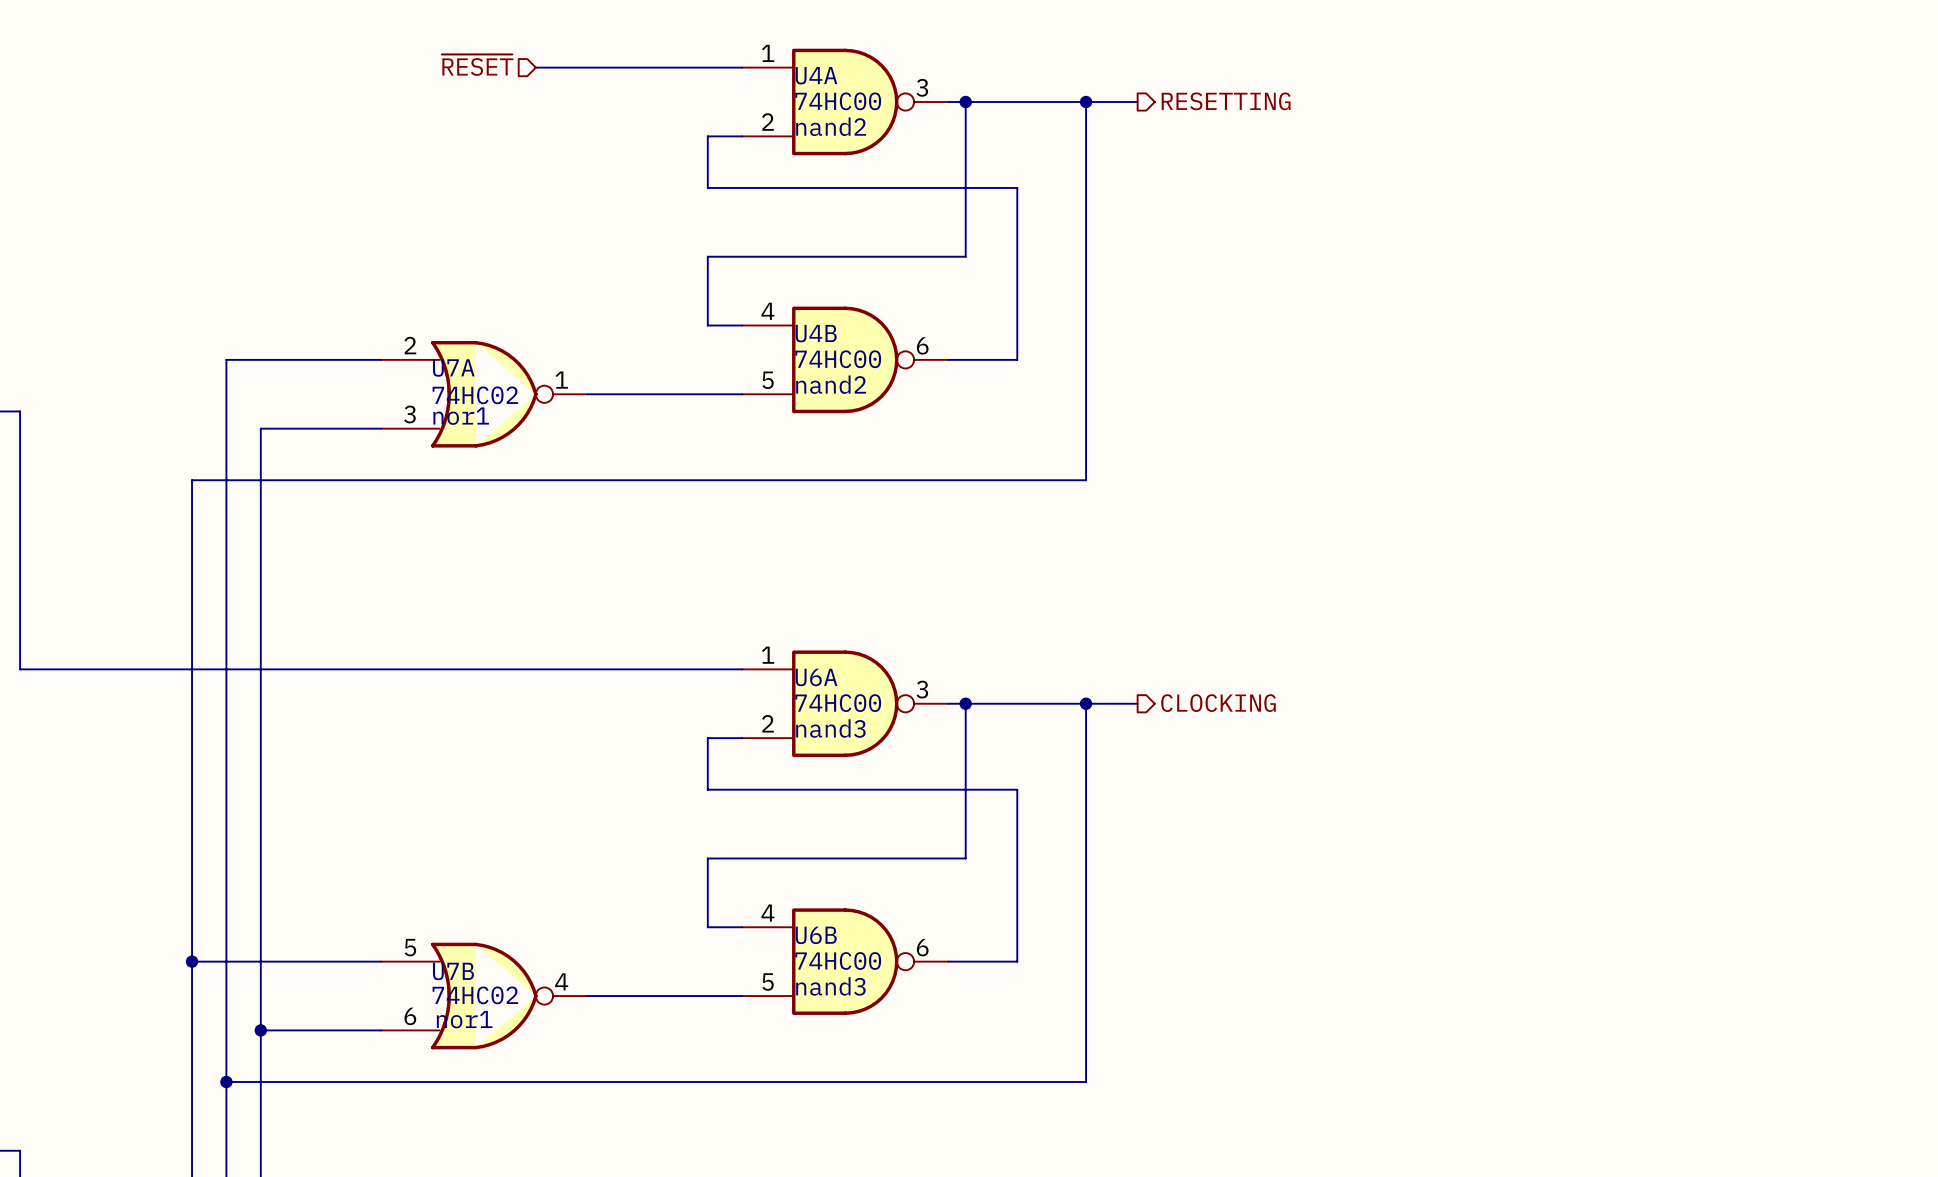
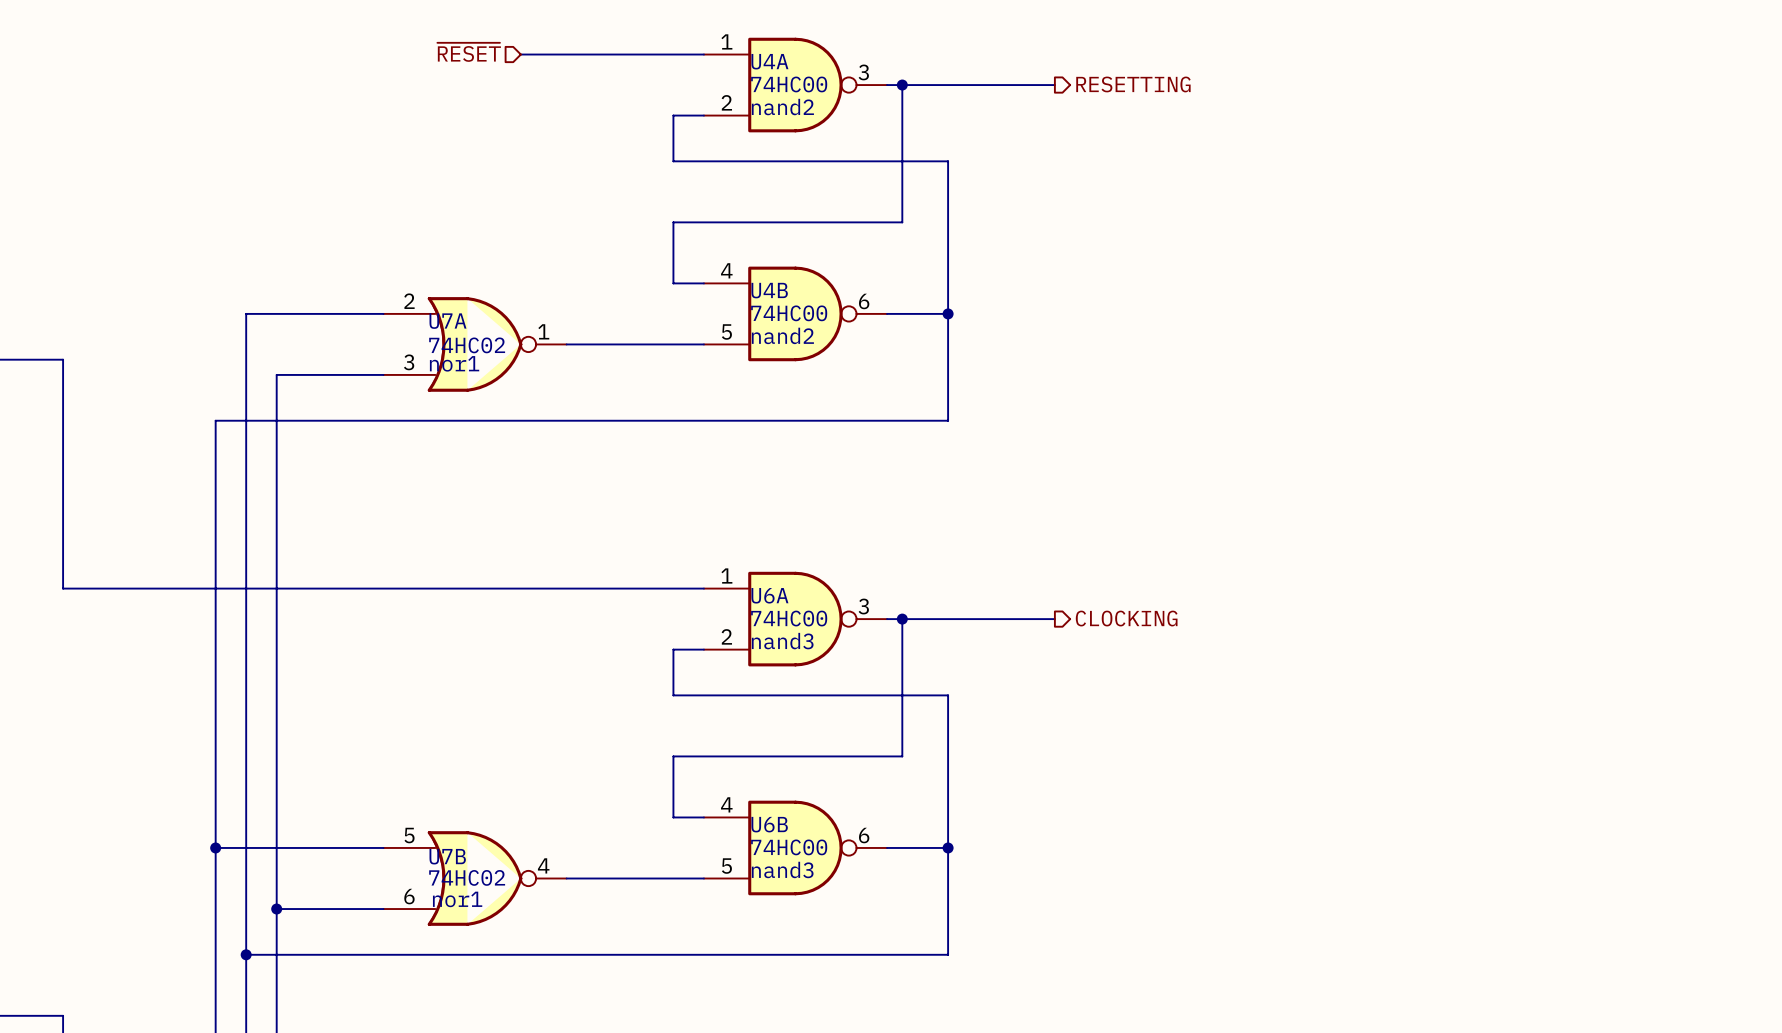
wire: (1086, 102) (1086, 480) (1017, 480) -> (948, 313) (948, 420)
junction: (1086, 102) -> none
junction: none -> (948, 313)
wire: (1086, 703) (1086, 1081) (1017, 1081) -> (948, 847) (948, 954)
junction: (1086, 703) -> none
junction: none -> (948, 847)

